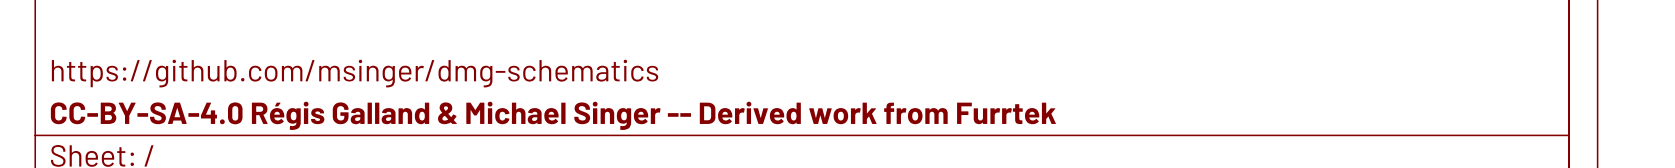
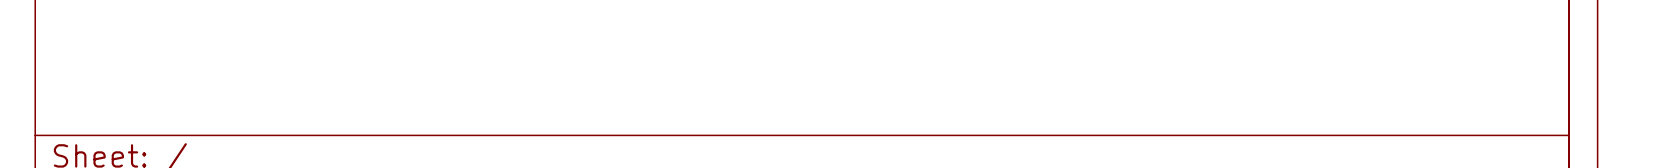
title block: https://github.com/msinger/dmg-schematics (355, 73) -> none
title block: CC-BY-SA-4.0 Régis Galland & Michael Singer -- Derived work from Furrtek (553, 115) -> none

